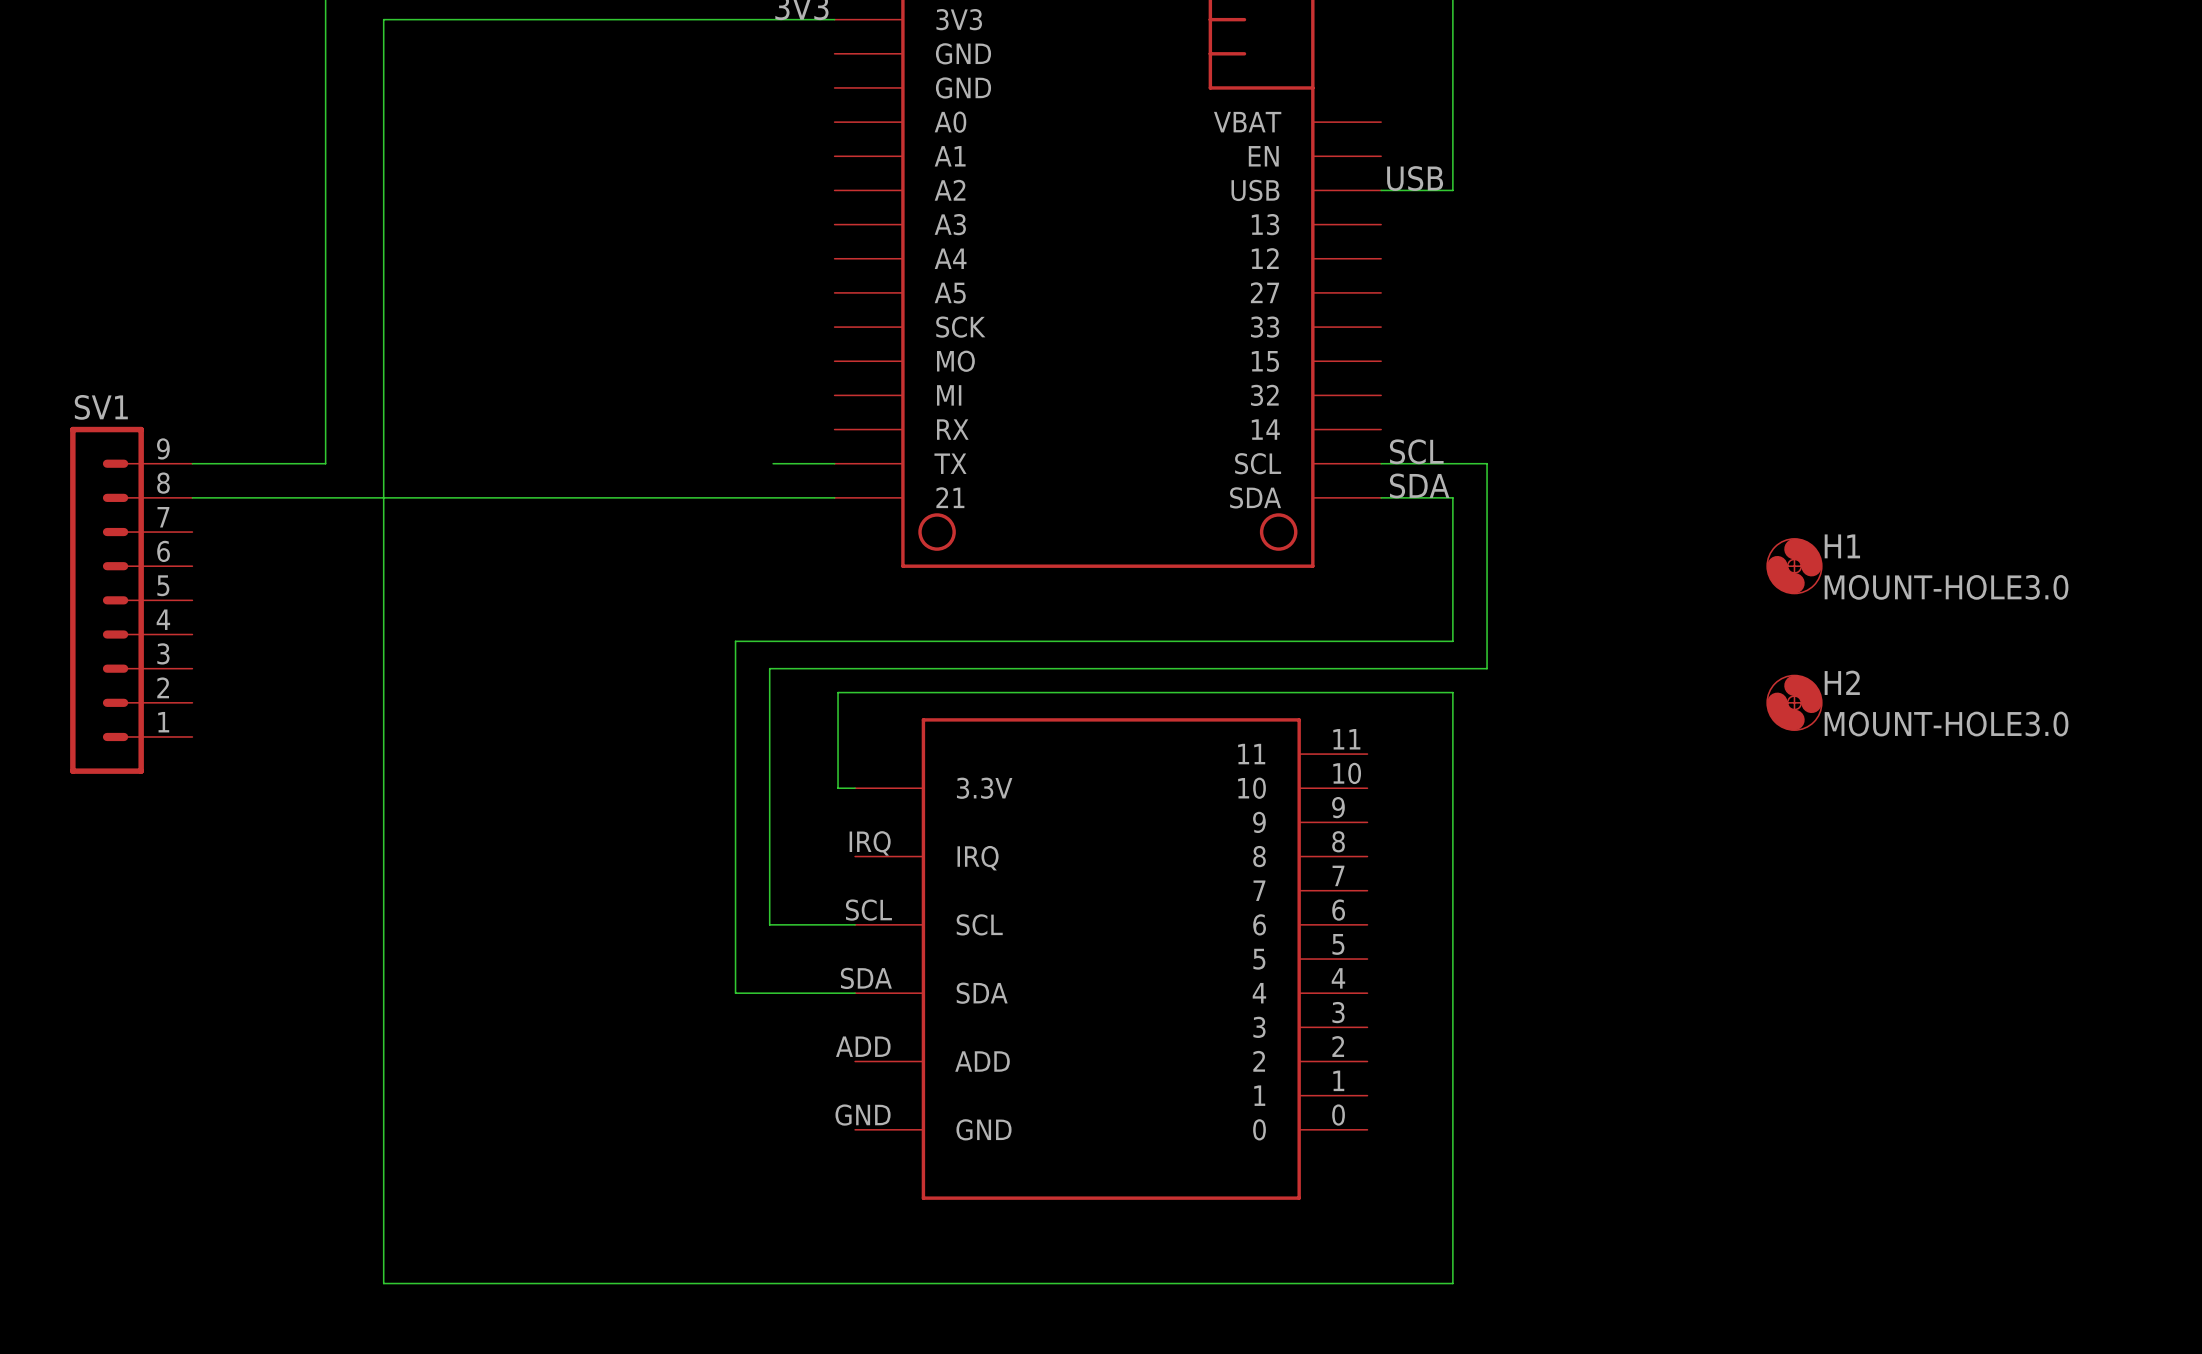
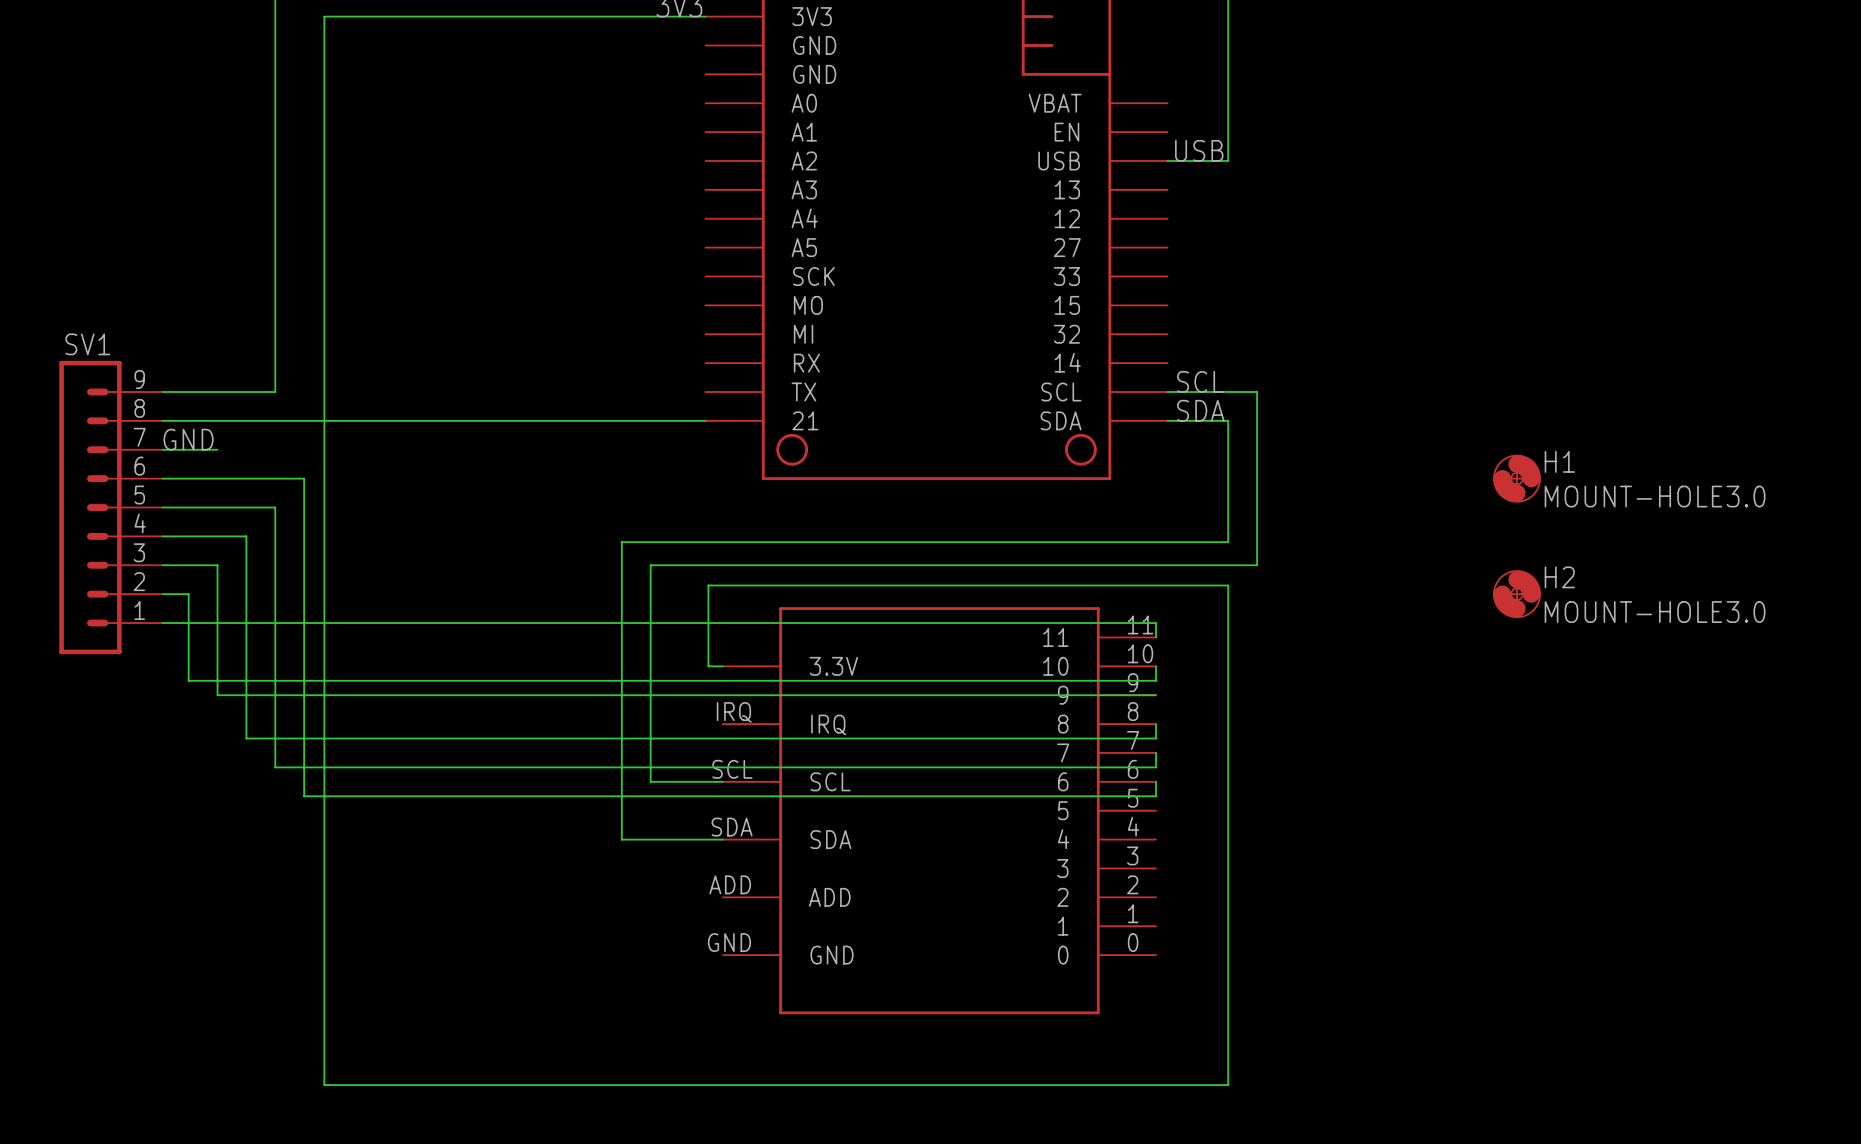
wire: (773, 463) (834, 463) -> none
label: none -> GND (188, 439)
wire: none -> (162, 449) (217, 449)
wire: none -> (162, 478) (304, 478) (304, 796) (1156, 796) (1156, 781)
wire: none -> (162, 507) (275, 507) (275, 767) (1156, 767) (1156, 752)
wire: none -> (162, 536) (246, 536) (246, 738) (1156, 738) (1156, 724)
wire: none -> (162, 565) (217, 565) (217, 695) (1156, 695)
wire: none -> (162, 594) (188, 594) (188, 680) (1156, 680) (1156, 666)
wire: none -> (162, 623) (1156, 623) (1156, 637)

